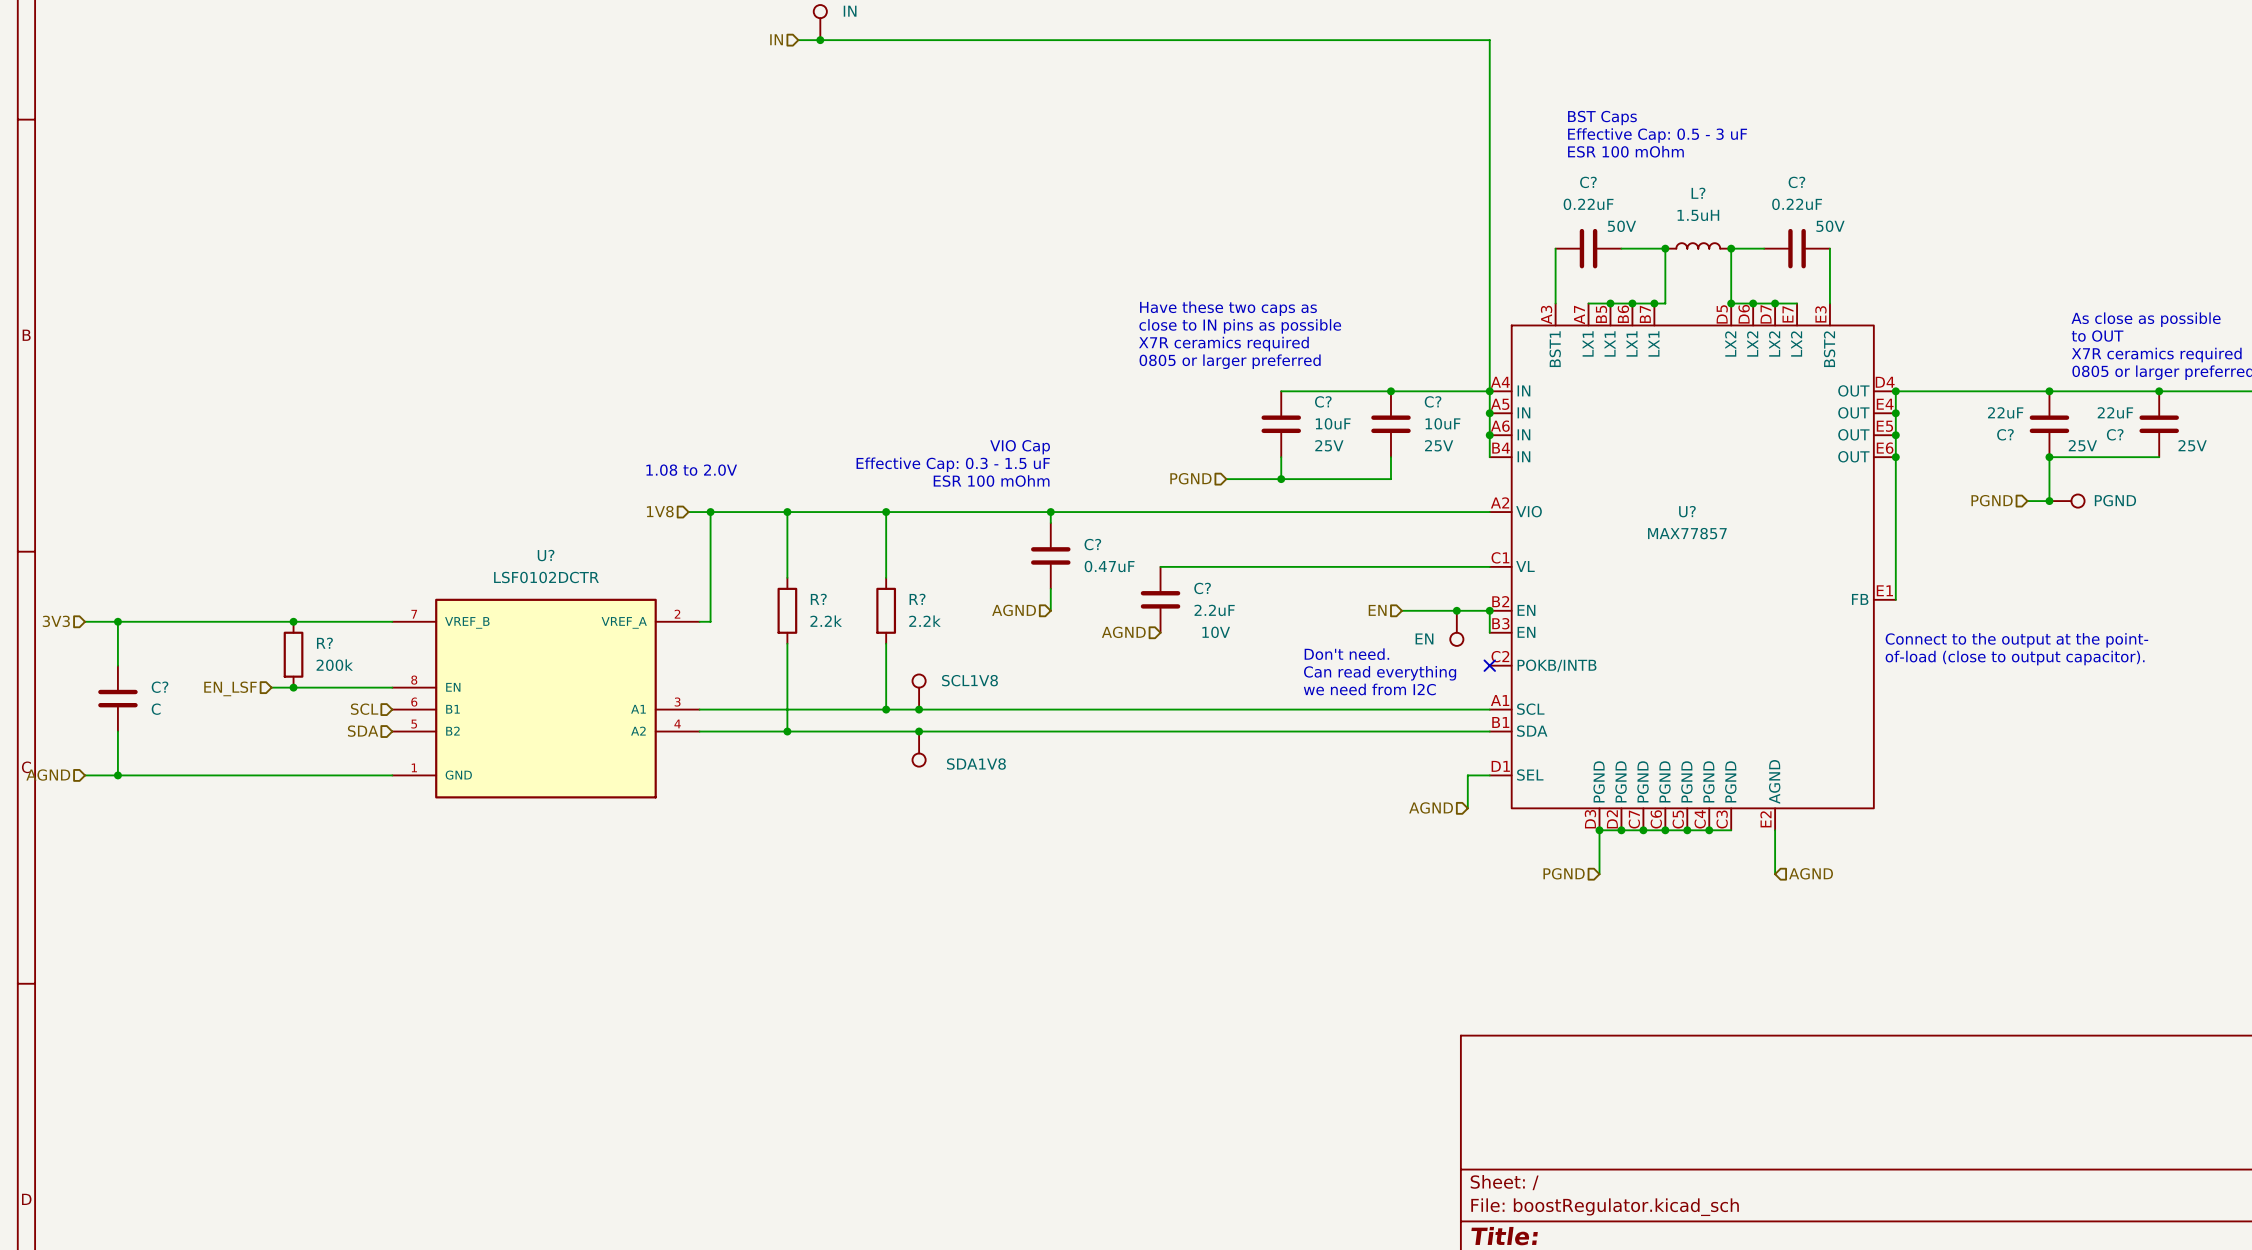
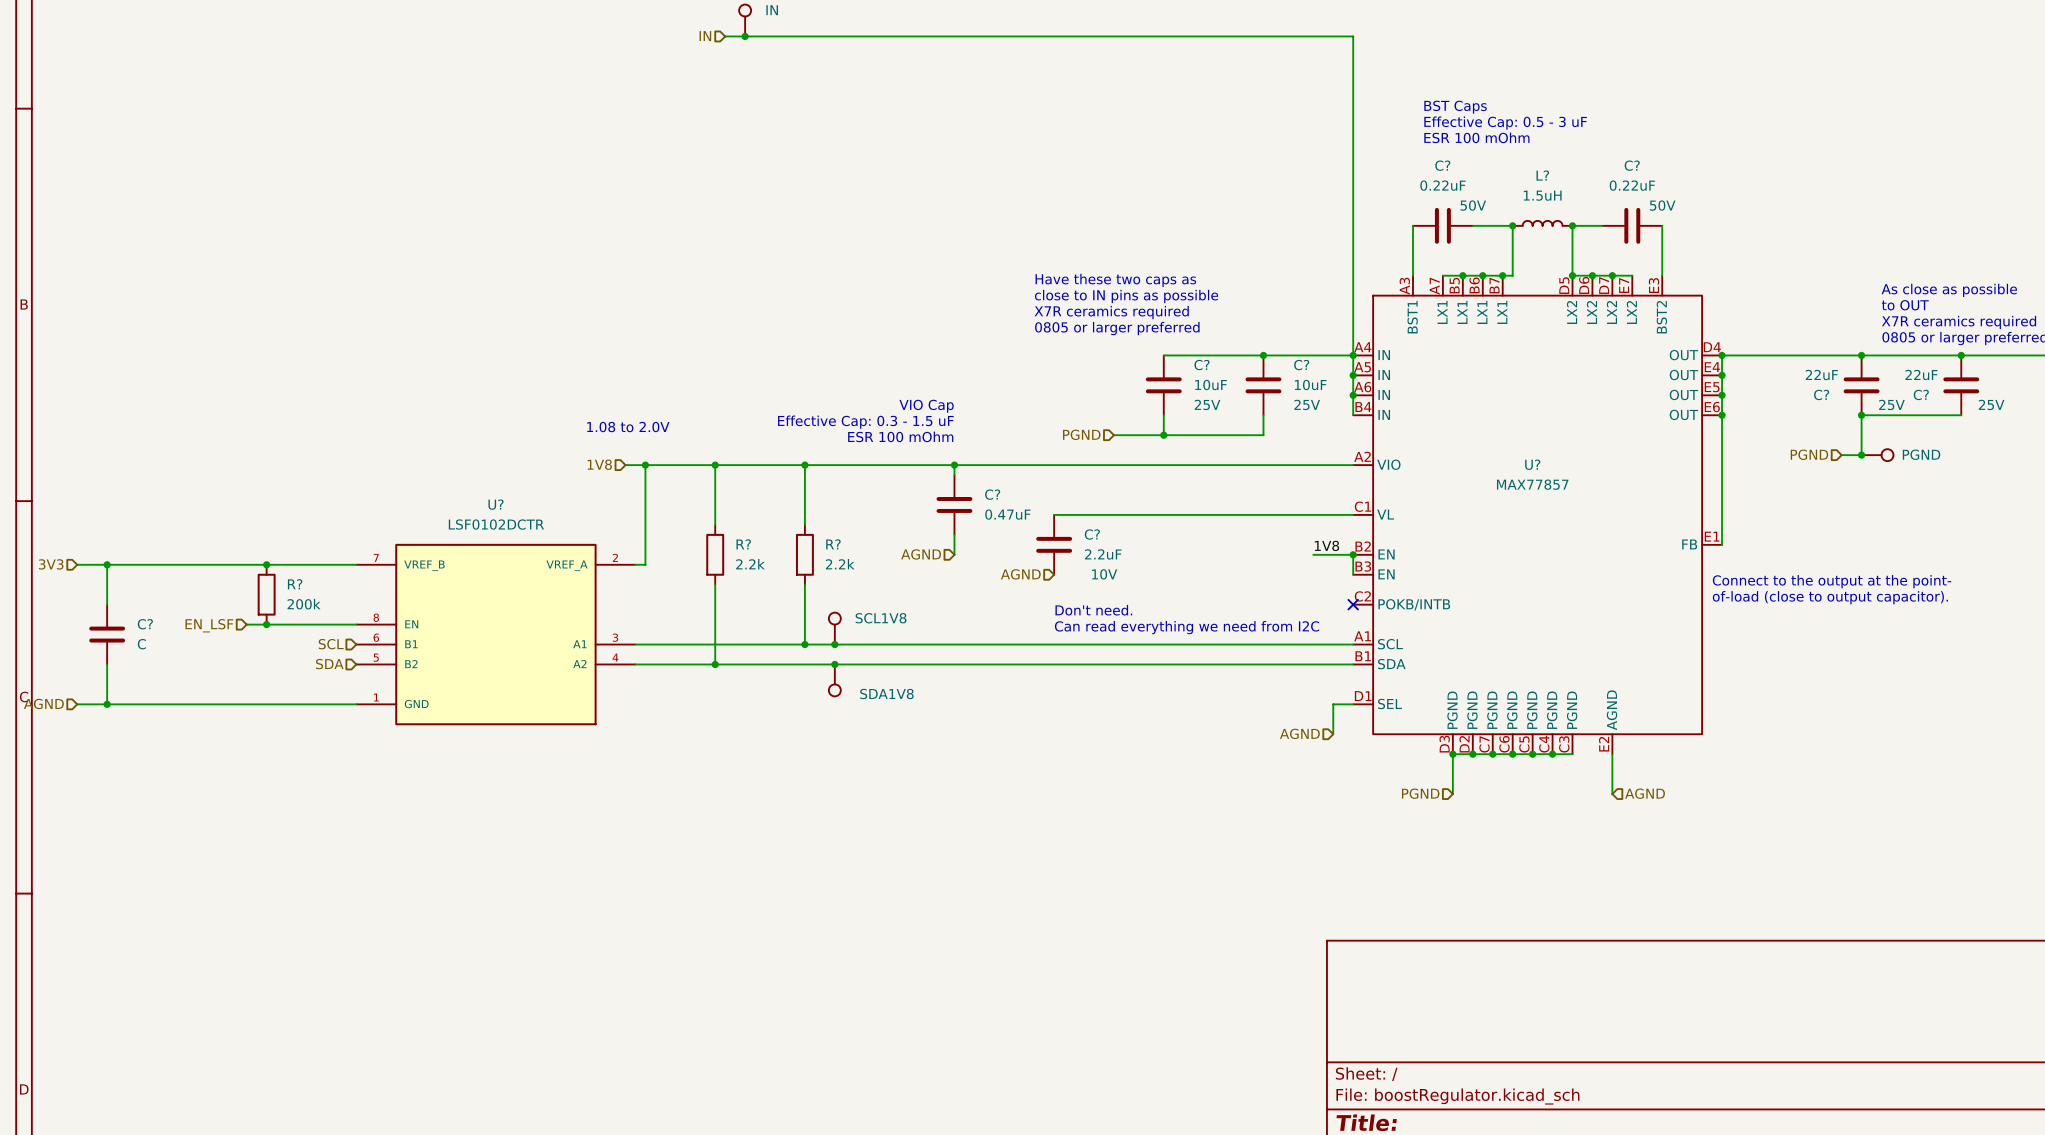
label: none -> 1V8 (1326, 545)
hierarchical label: EN (1377, 610) -> none
wire: (1401, 610) (1445, 610) -> none
junction: (1456, 610) -> none
EN: (1456, 628) -> none
text position: Don't need. (1346, 654) -> Don't need. (1093, 610)
text: Can read everything (1380, 673) -> none
text: we need from I2C (1369, 689) -> none
text: none -> Can read everything we need from I2C (1187, 627)

